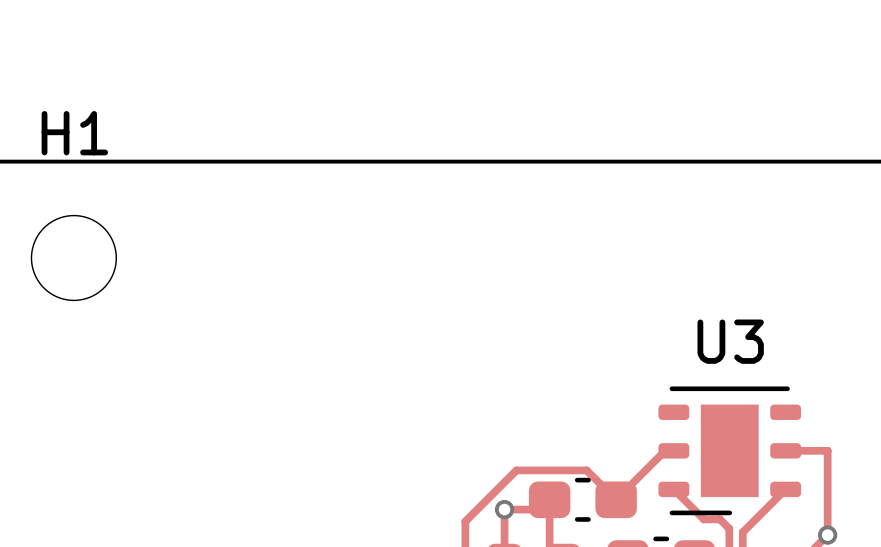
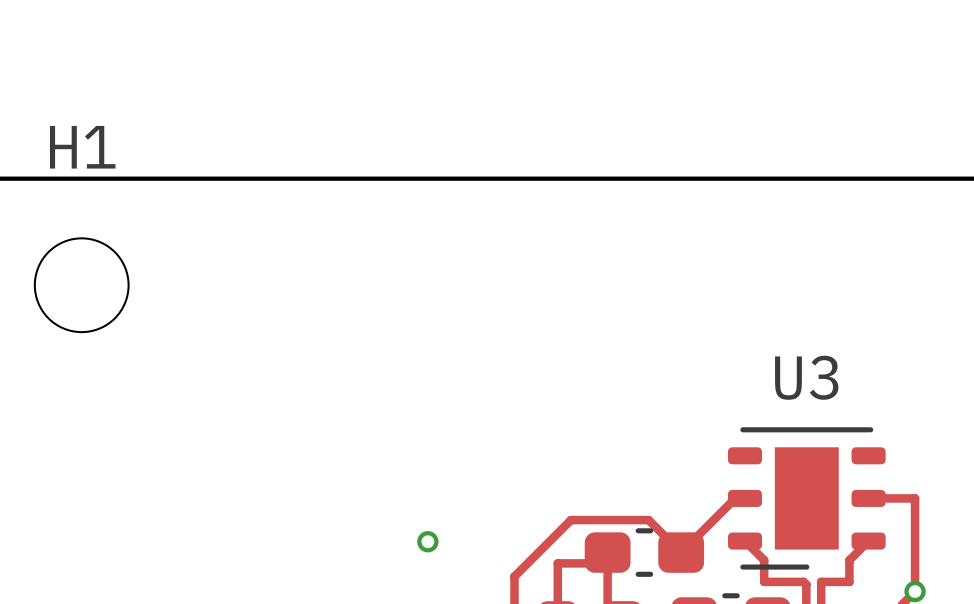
via: none -> (427, 541)
track: (691, 506) (703, 519) (719, 519) (726, 526) -> (764, 560) (764, 581) (803, 581)
track: (768, 506) (742, 532) -> (849, 560) (849, 581) (821, 581) (821, 588)
via: (504, 509) -> none

